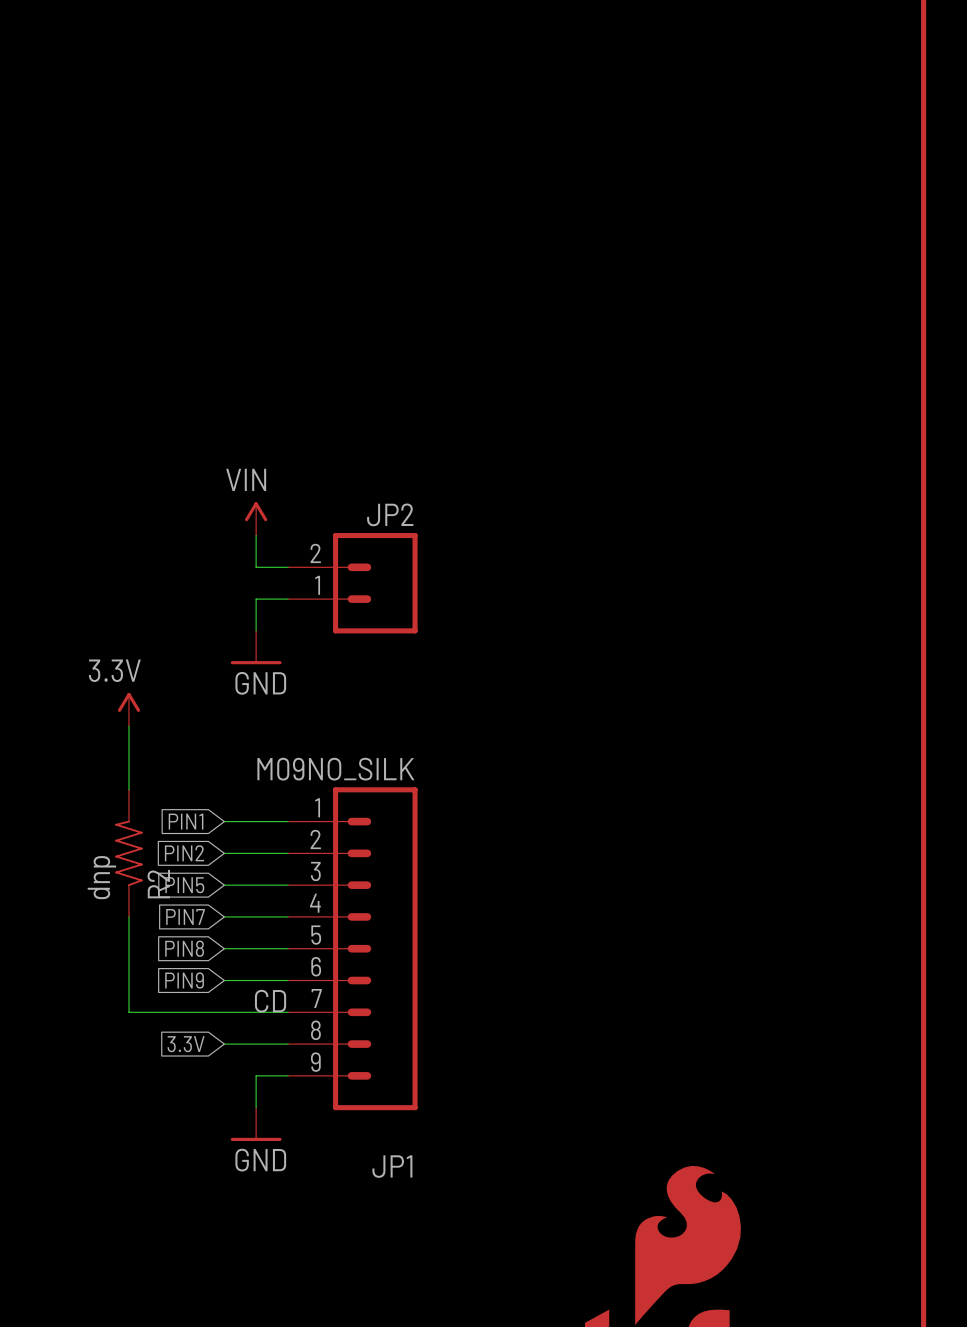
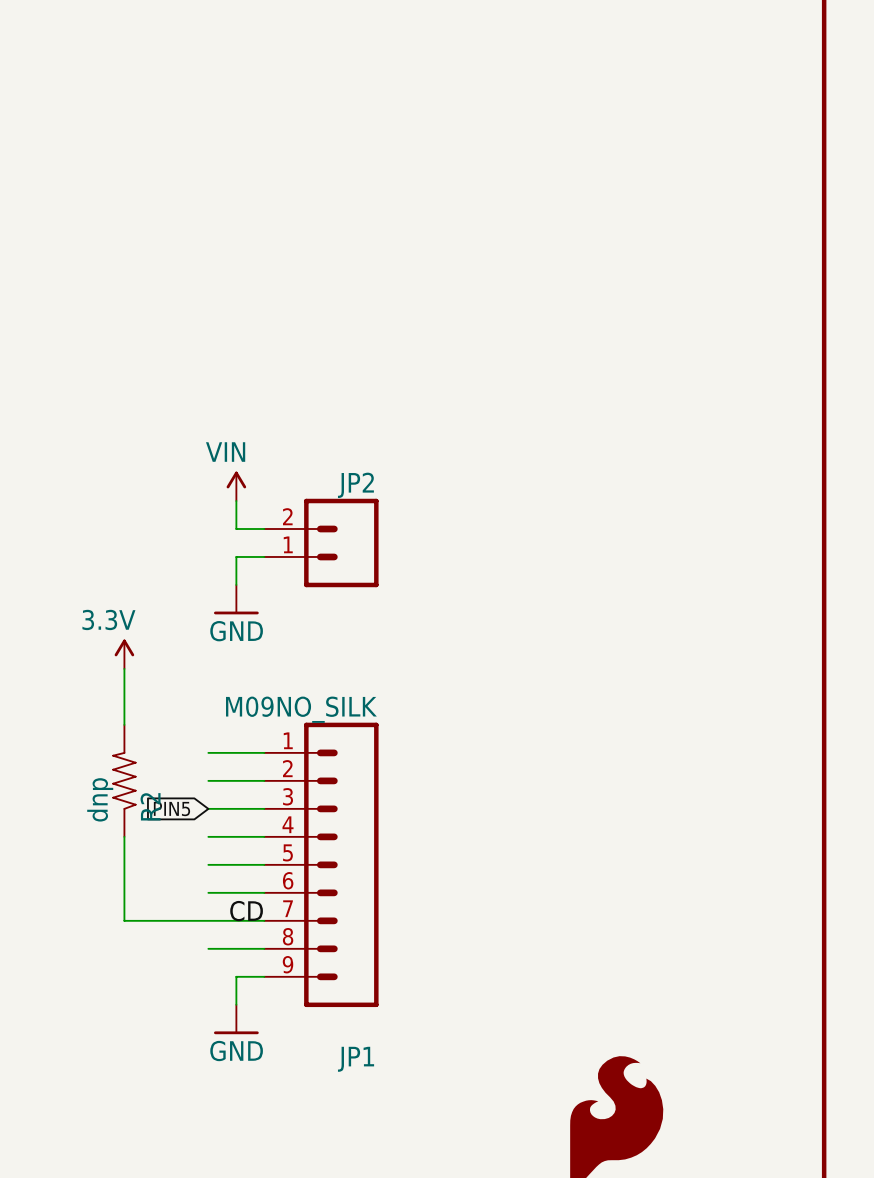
global label: PIN1 (186, 821) -> none
global label: PIN2 (184, 853) -> none
global label: PIN7 (185, 916) -> none
global label: PIN8 (184, 948) -> none
global label: PIN9 (184, 980) -> none
global label: 3.3V (186, 1044) -> none

